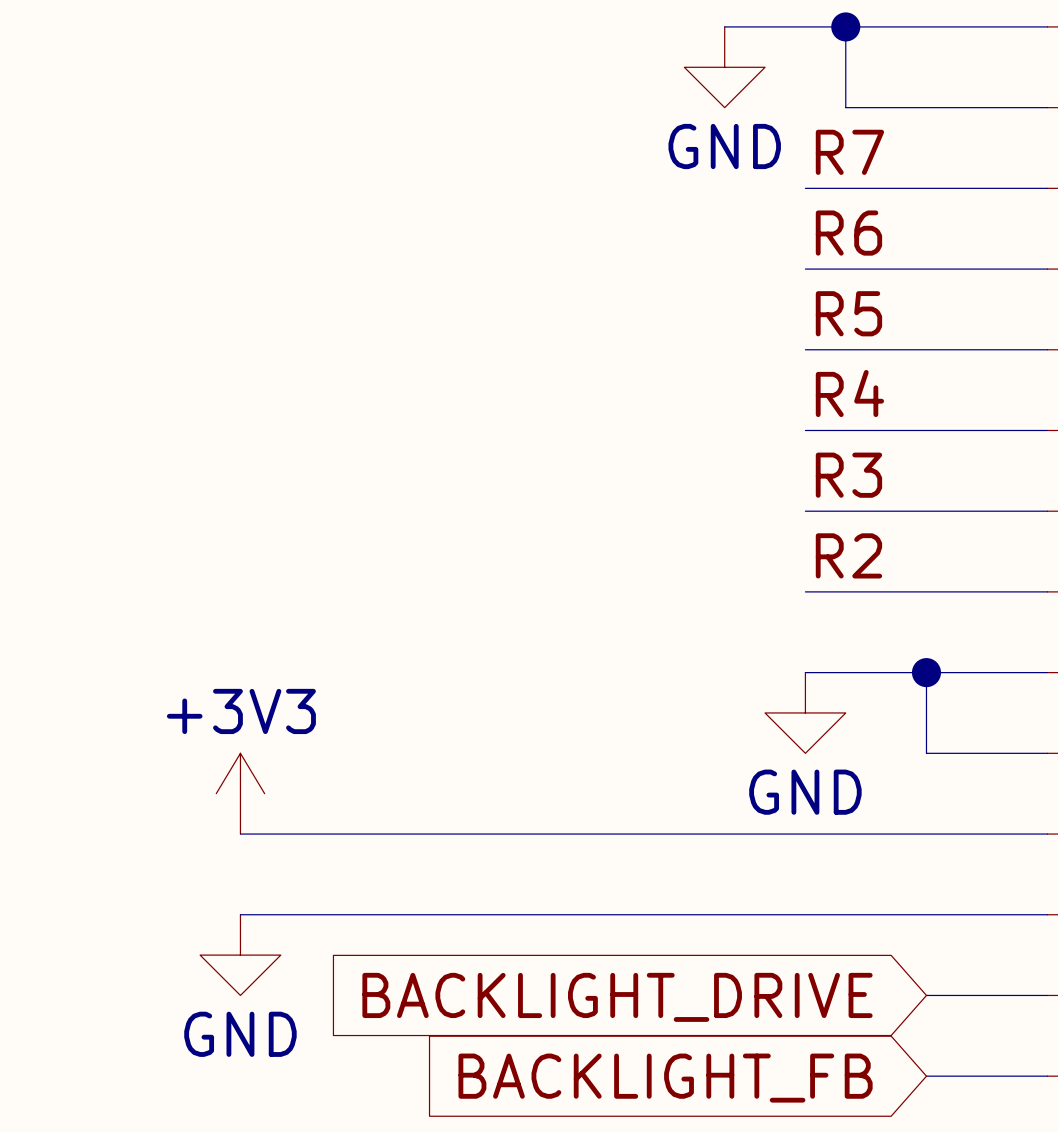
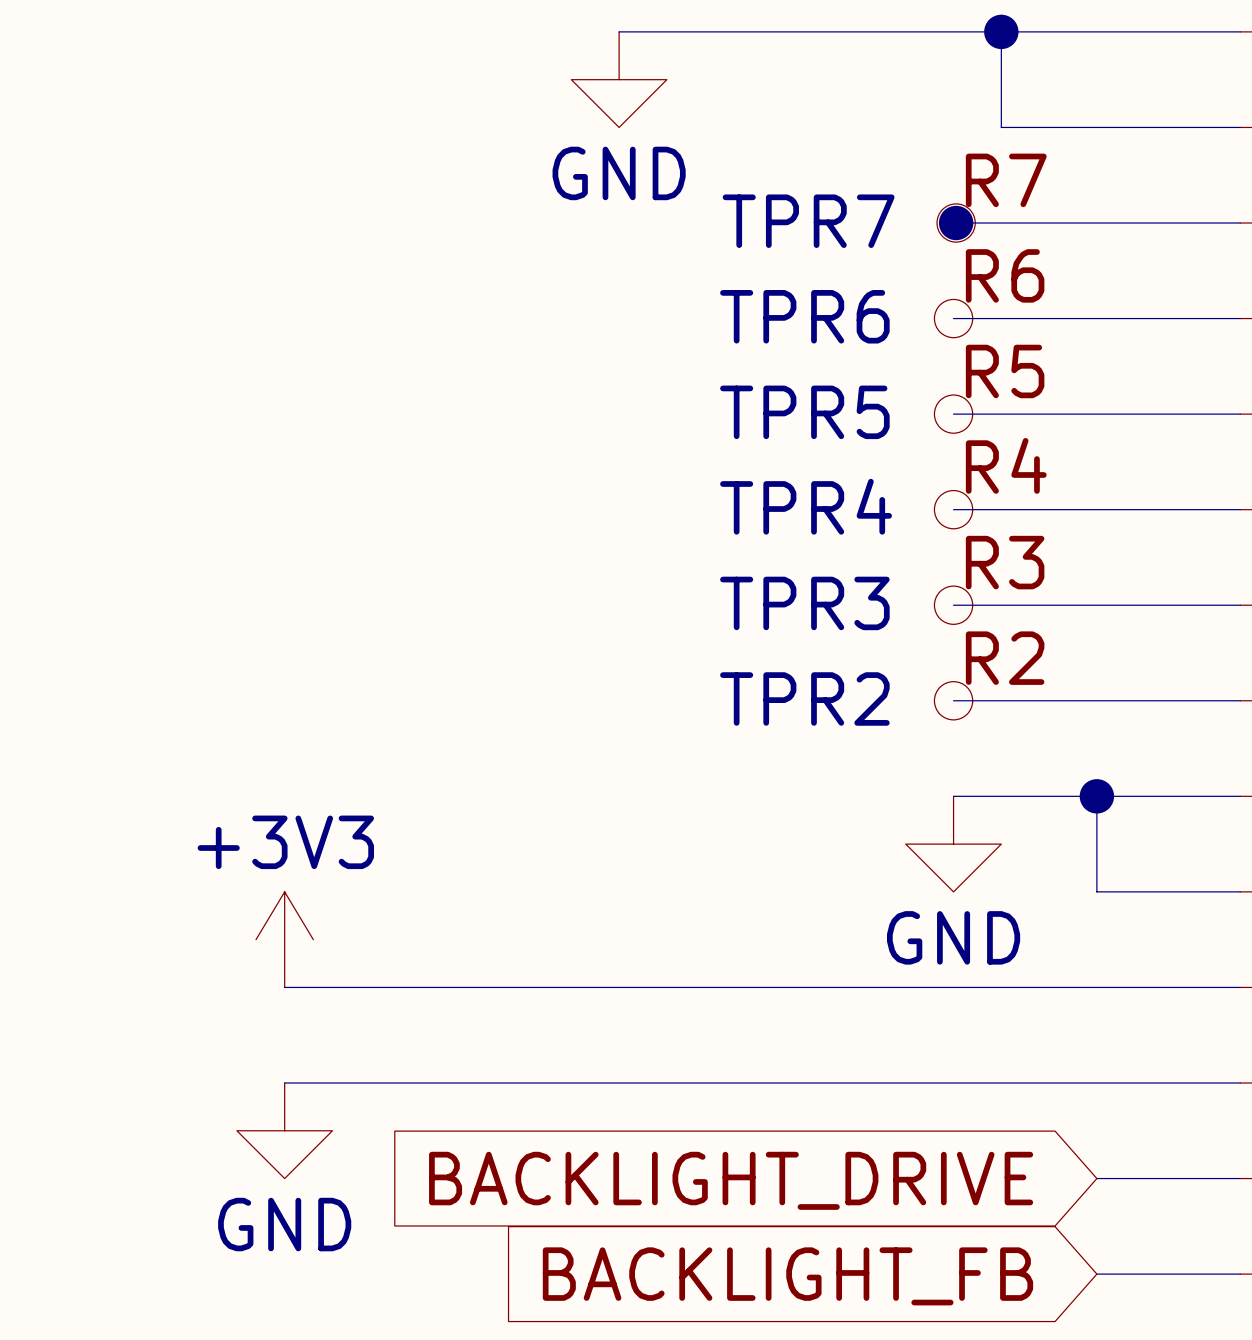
wire: none -> (619, 31) (858, 31)
power symbol position: GND (724, 67) -> GND (619, 79)
junction: none -> (956, 223)
TPR7: none -> (956, 223)
TPR6: none -> (953, 318)
TPR5: none -> (953, 414)
TPR4: none -> (953, 509)
TPR3: none -> (953, 605)
TPR2: none -> (953, 700)

